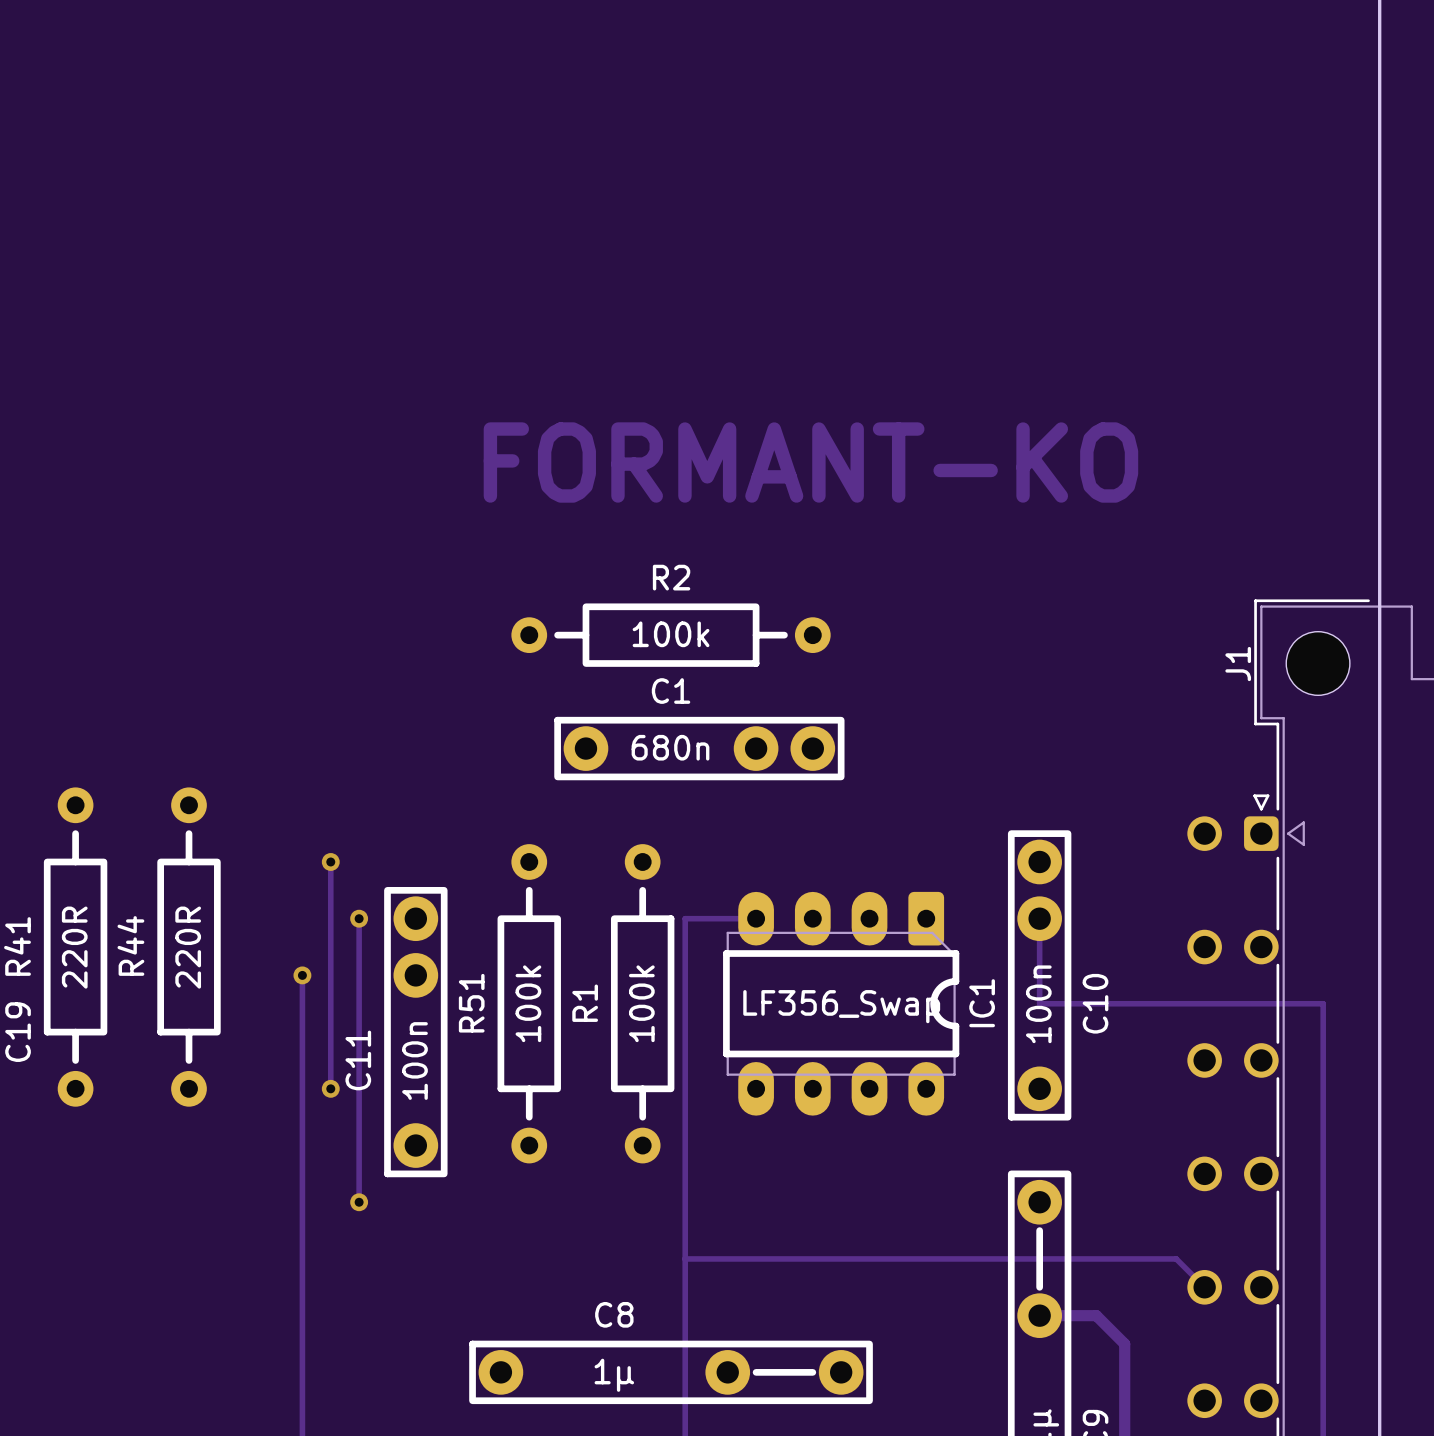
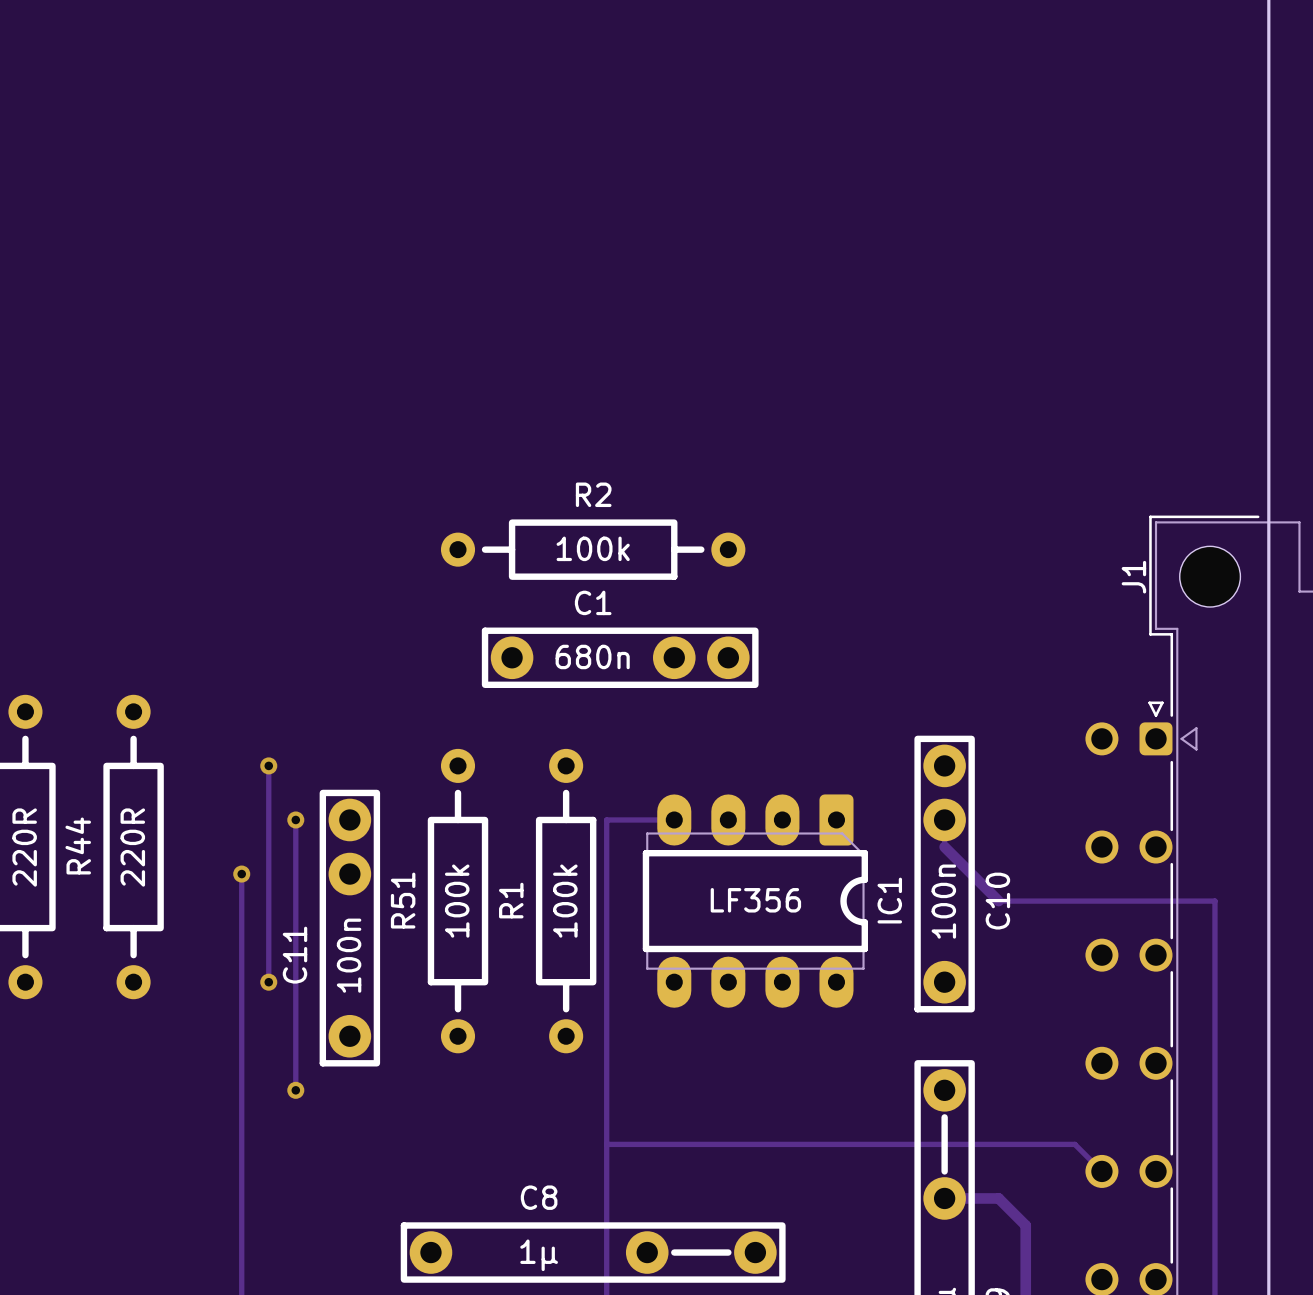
text: FORMANT-KO (810, 462) -> none
track: (1039, 947) (1039, 1003) (1096, 1003) -> (944, 847) (998, 901)
IC1 value: LF356_Swap (841, 1006) -> LF356 (755, 900)

